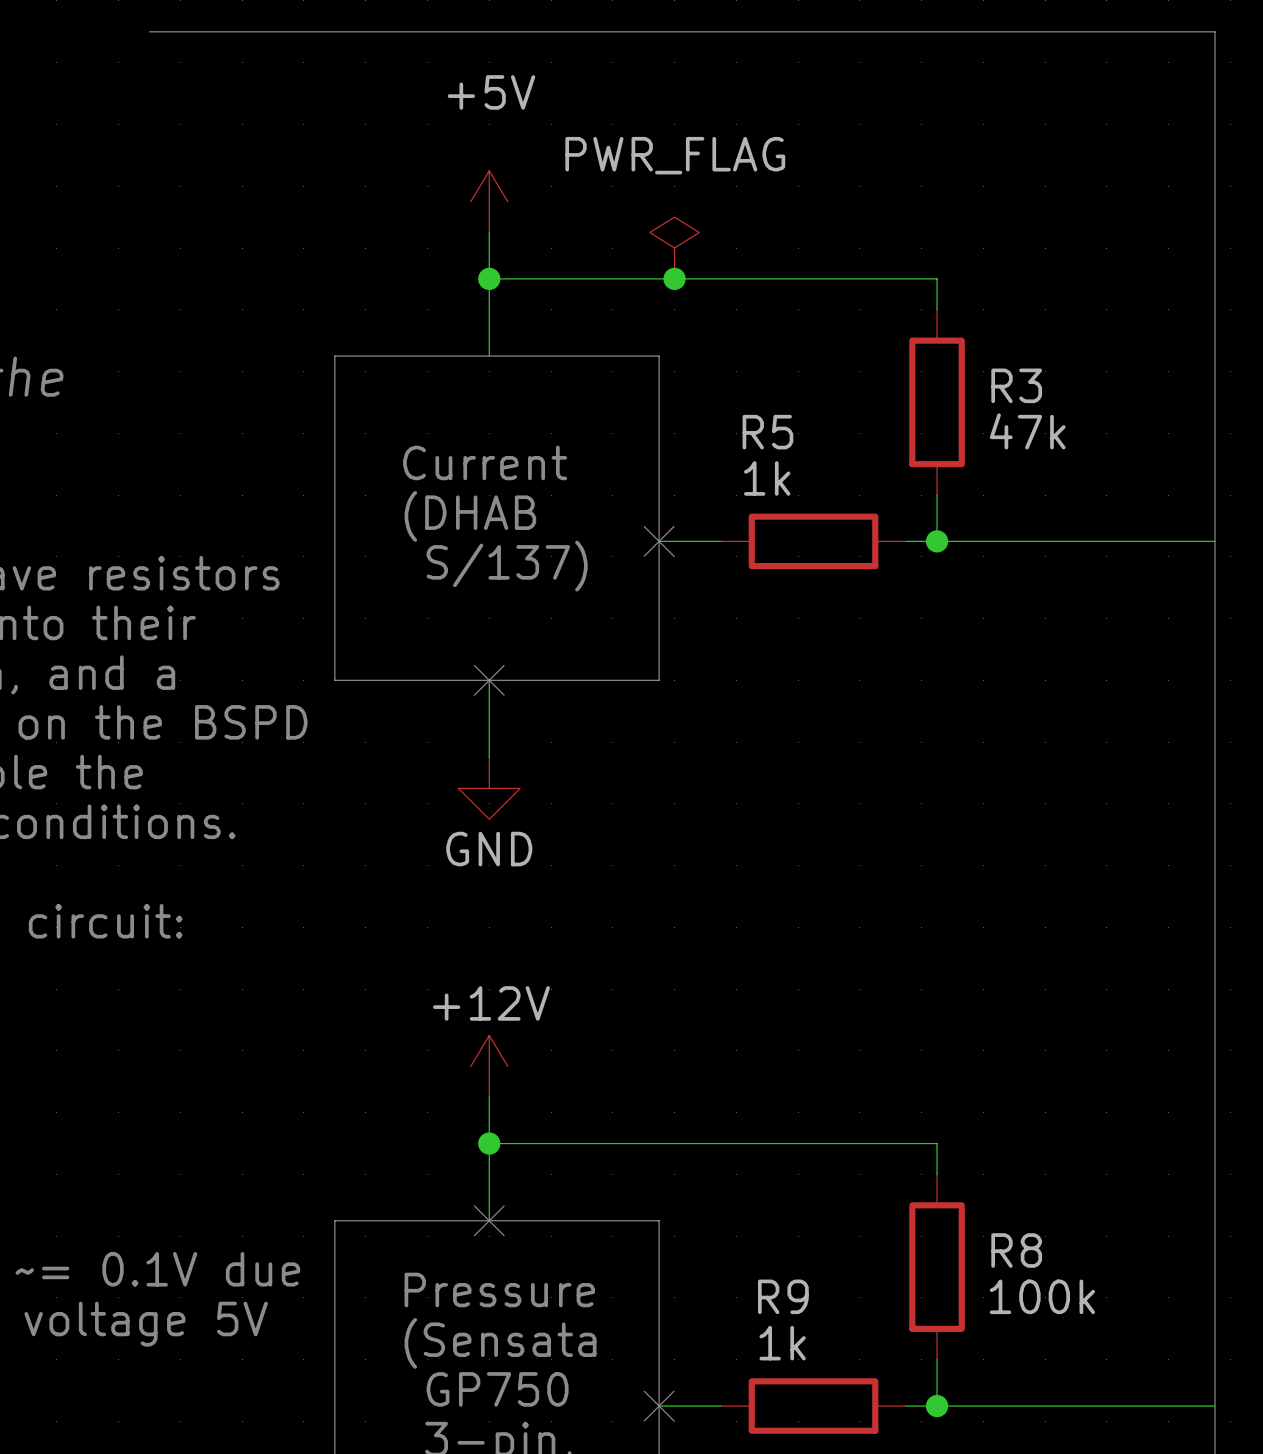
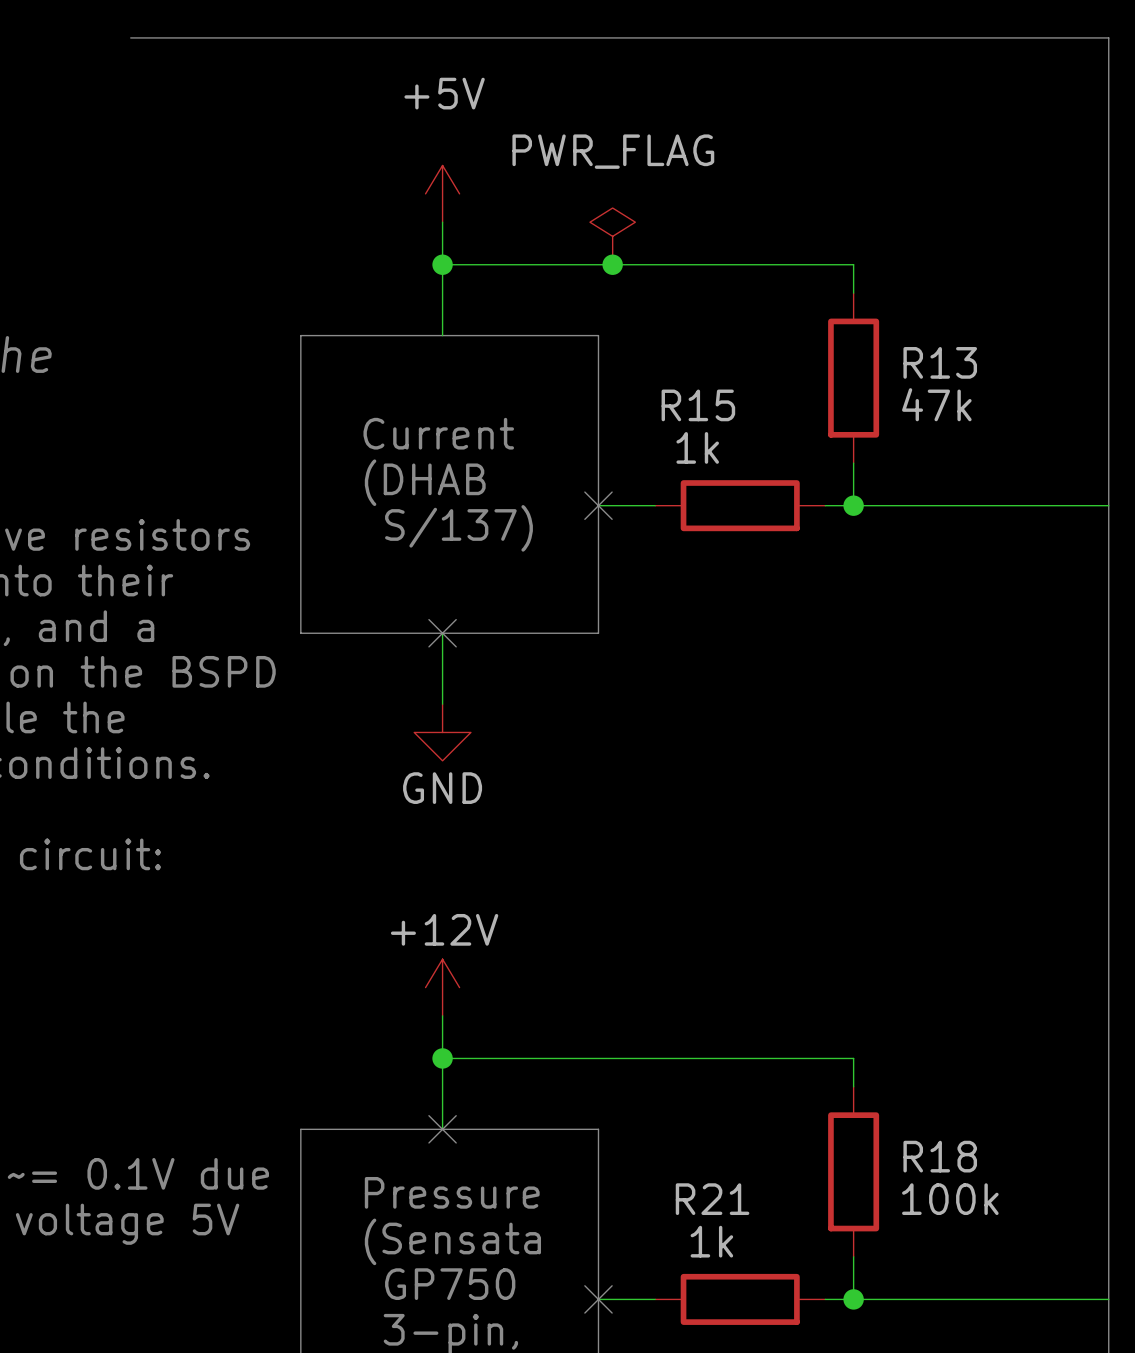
R3 name: R3 (1016, 385) -> R13 (940, 362)
R5 name: R5 (767, 432) -> R15 (698, 405)
R8 name: R8 (1016, 1250) -> R18 (940, 1156)
R9 name: R9 (783, 1296) -> R21 (712, 1199)

